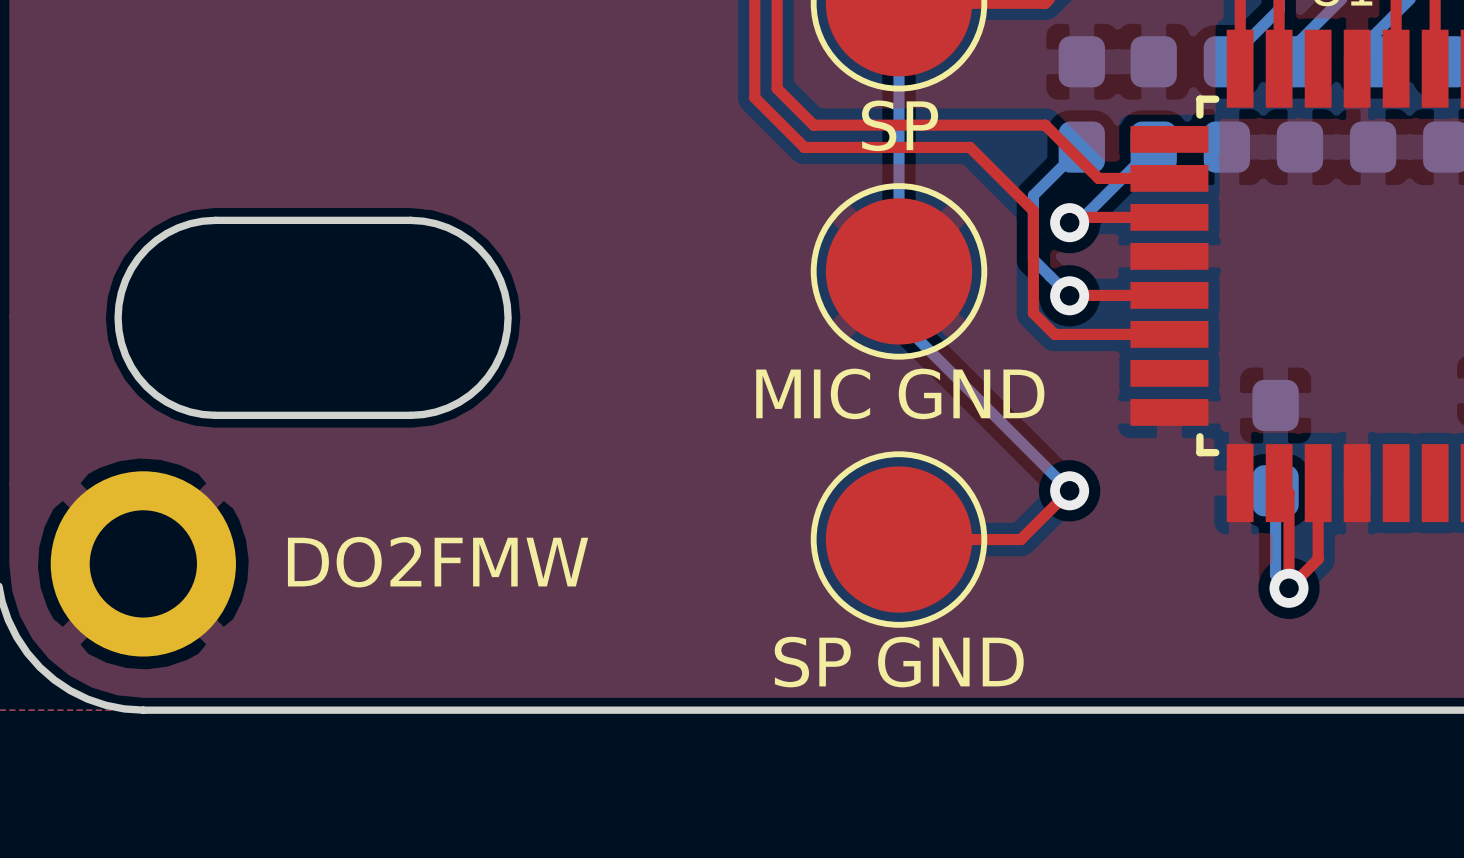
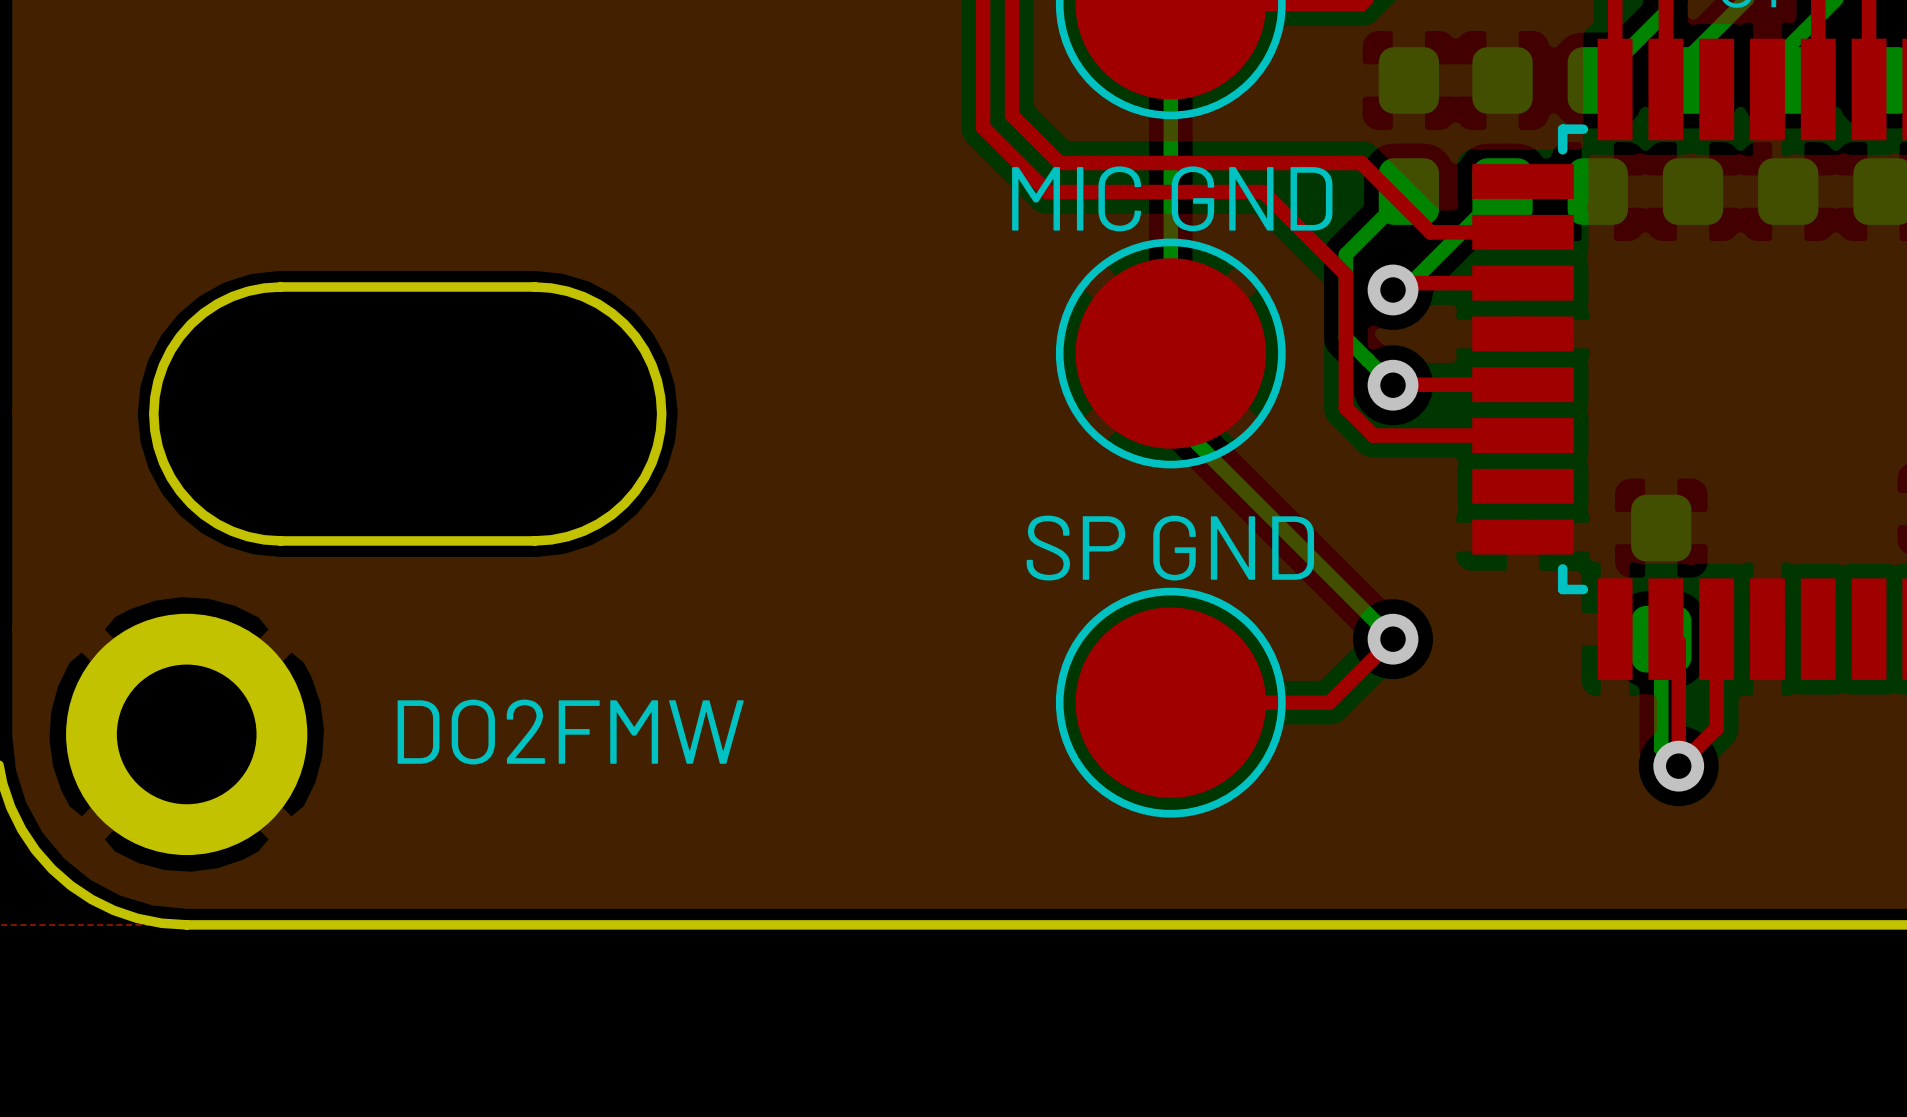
part value: SP (900, 125) -> none
MIC GND name: none -> MIC GND (1172, 198)
MIC GND value: MIC GND (900, 393) -> none
SP GND name: none -> SP GND (1170, 548)
SP GND value: SP GND (899, 662) -> none

